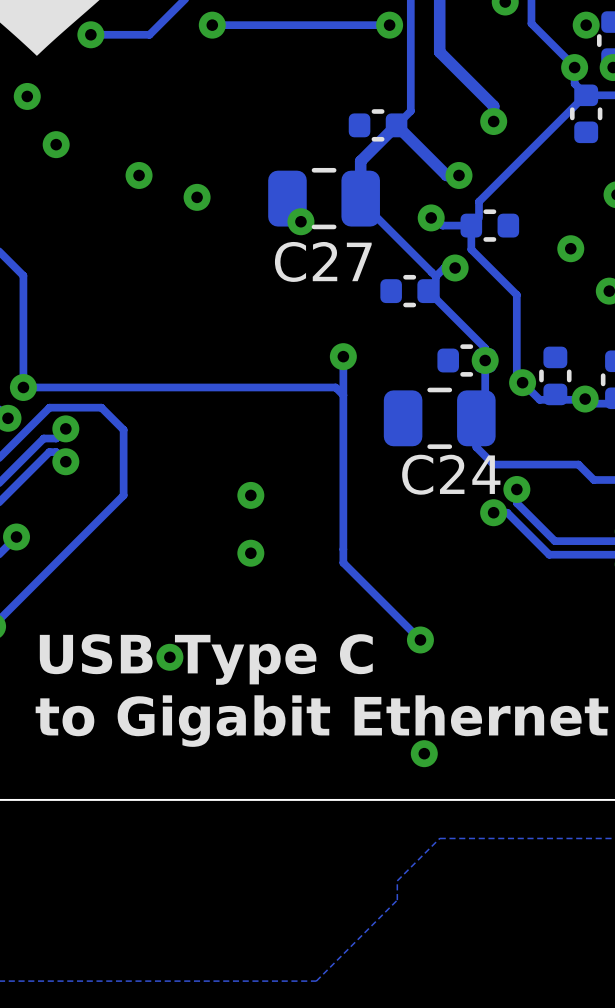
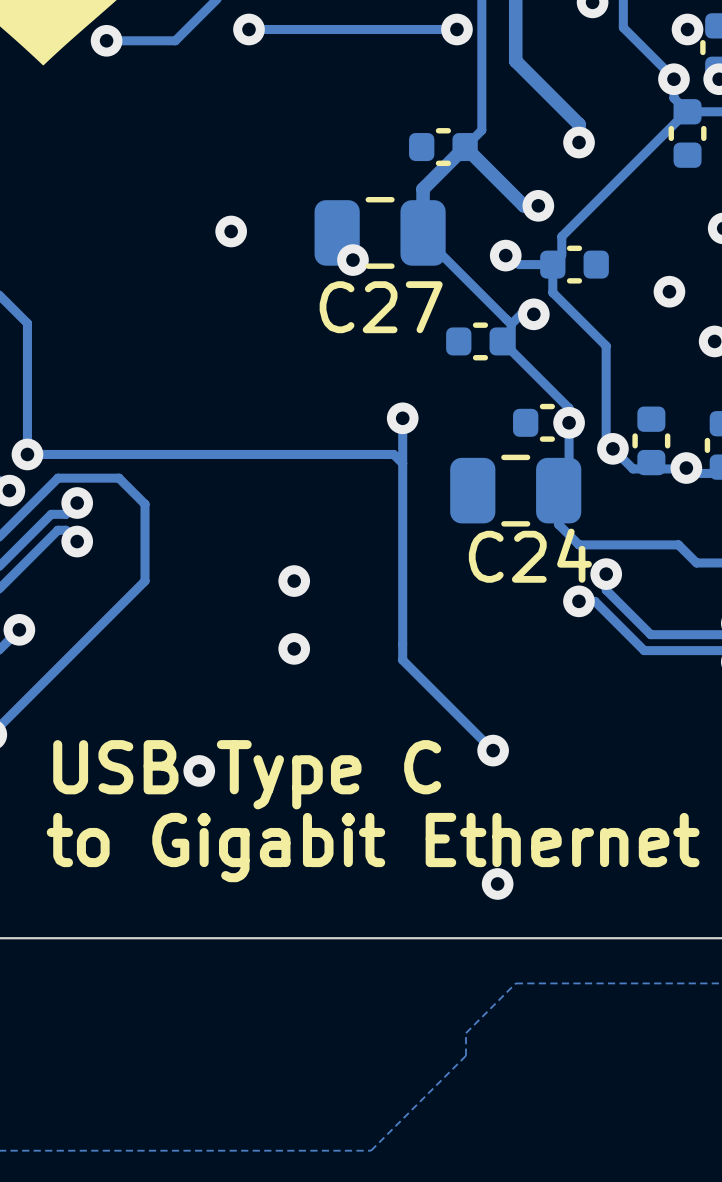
via: (27, 96) -> none
via: (56, 144) -> none
via: (139, 175) -> none

